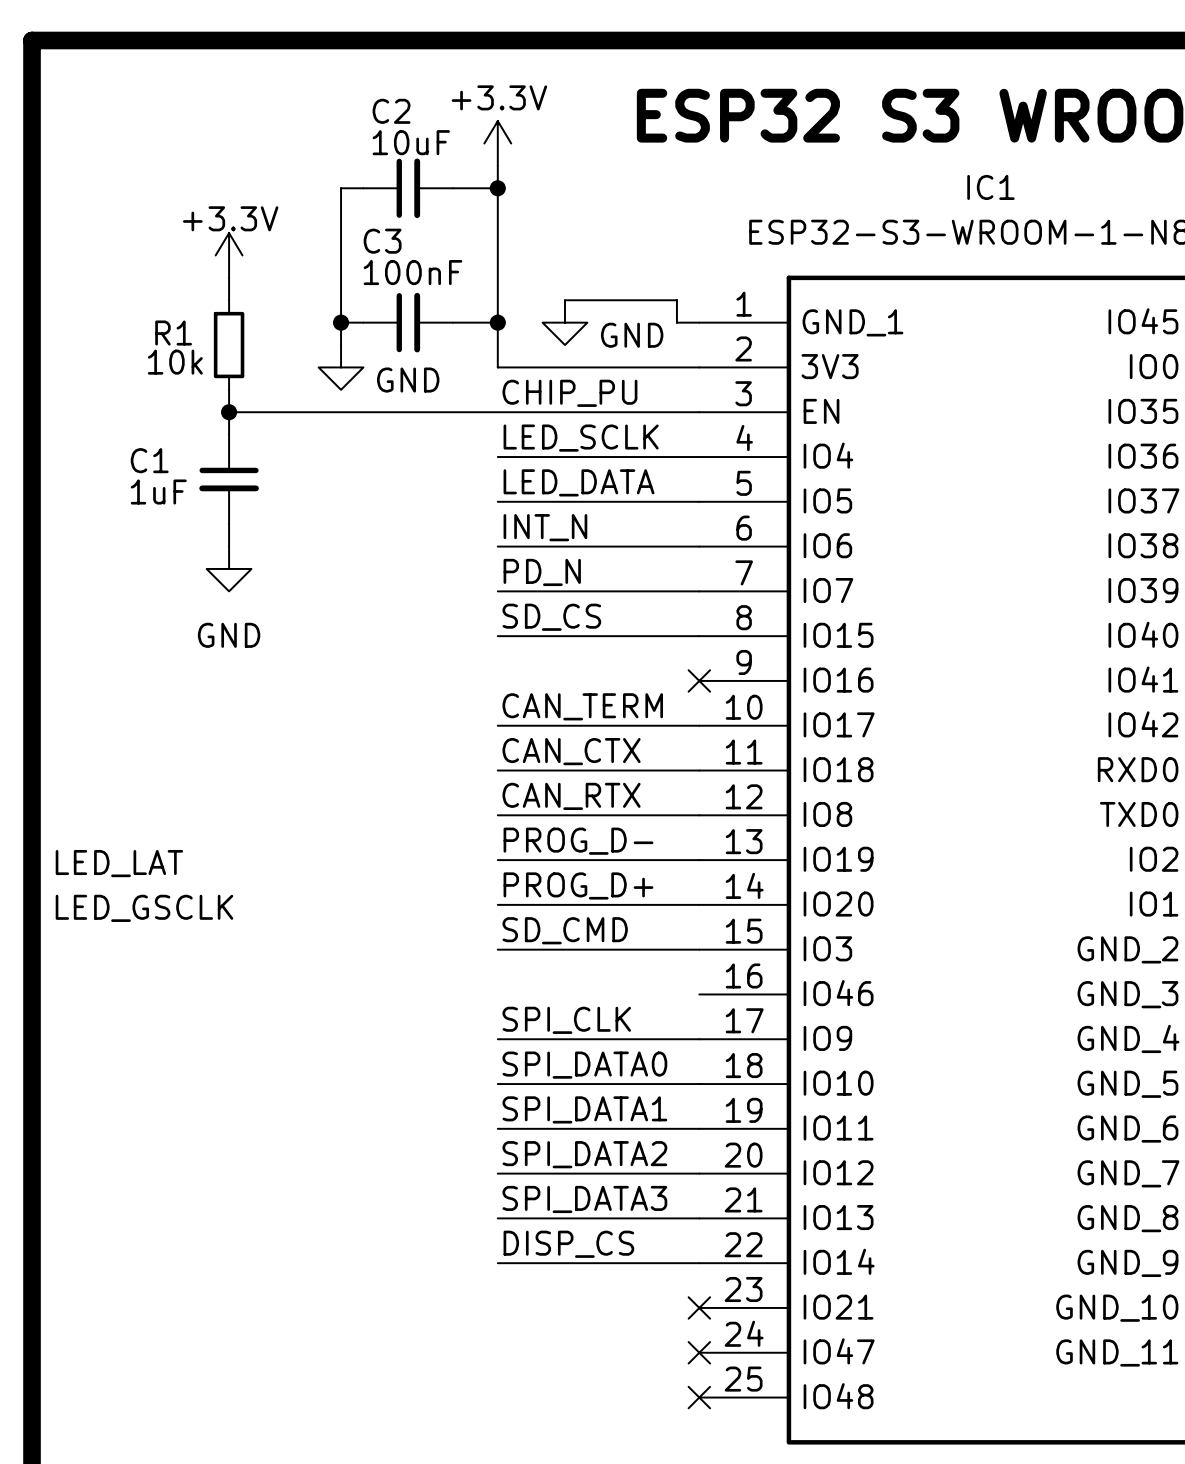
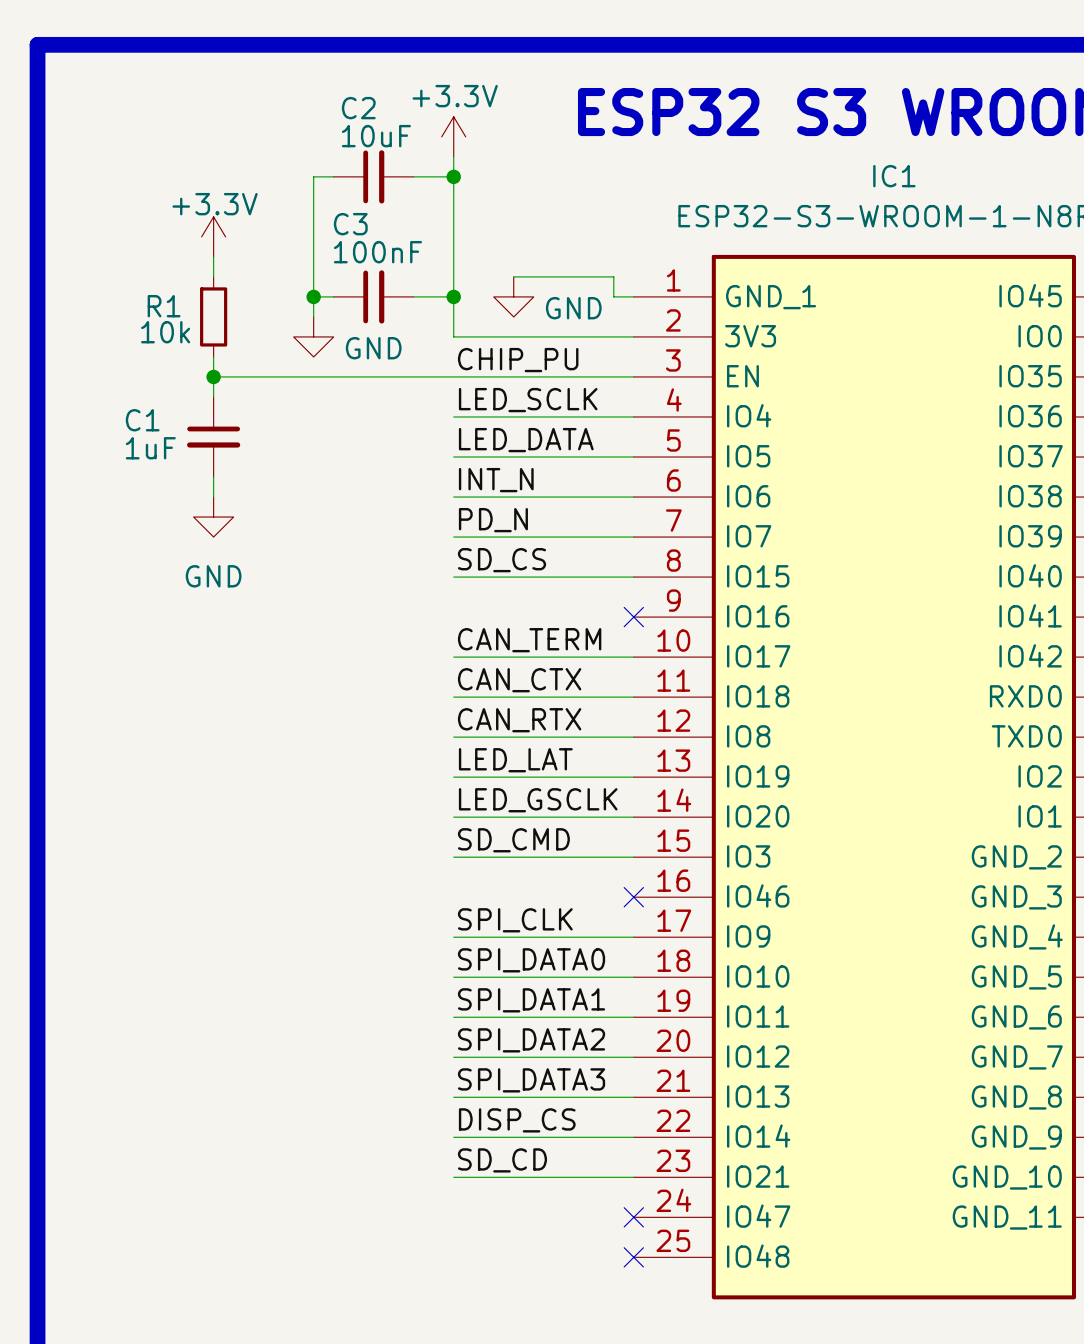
label: PROG_D- (578, 841) -> LED_LAT (515, 760)
label: LED_LAT (119, 863) -> none
label: PROG_D+ (578, 885) -> LED_GSCLK (538, 800)
label: LED_GSCLK (144, 908) -> none
no-connect mark: none -> (633, 897)
label: none -> SD_CD (502, 1160)
wire: none -> (453, 1177) (633, 1177)
no-connect mark: (699, 1307) -> none

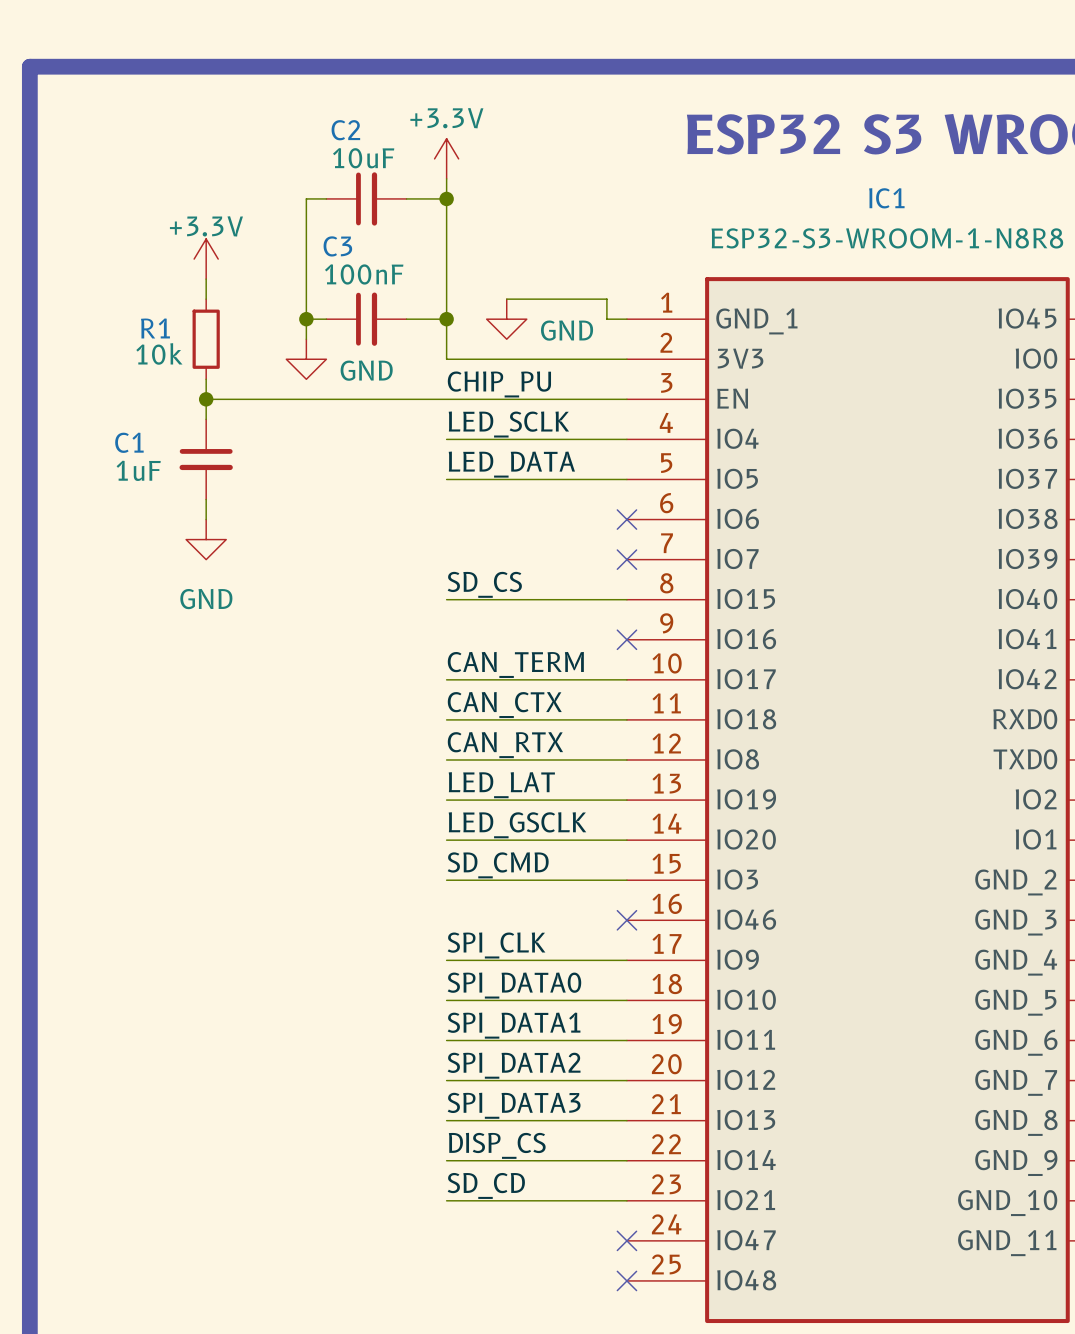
label: INT_N (496, 480) -> none
wire: (453, 497) (633, 497) -> none
no-connect mark: none -> (626, 519)
label: PD_N (493, 520) -> none
wire: (453, 537) (633, 537) -> none
no-connect mark: none -> (626, 559)

